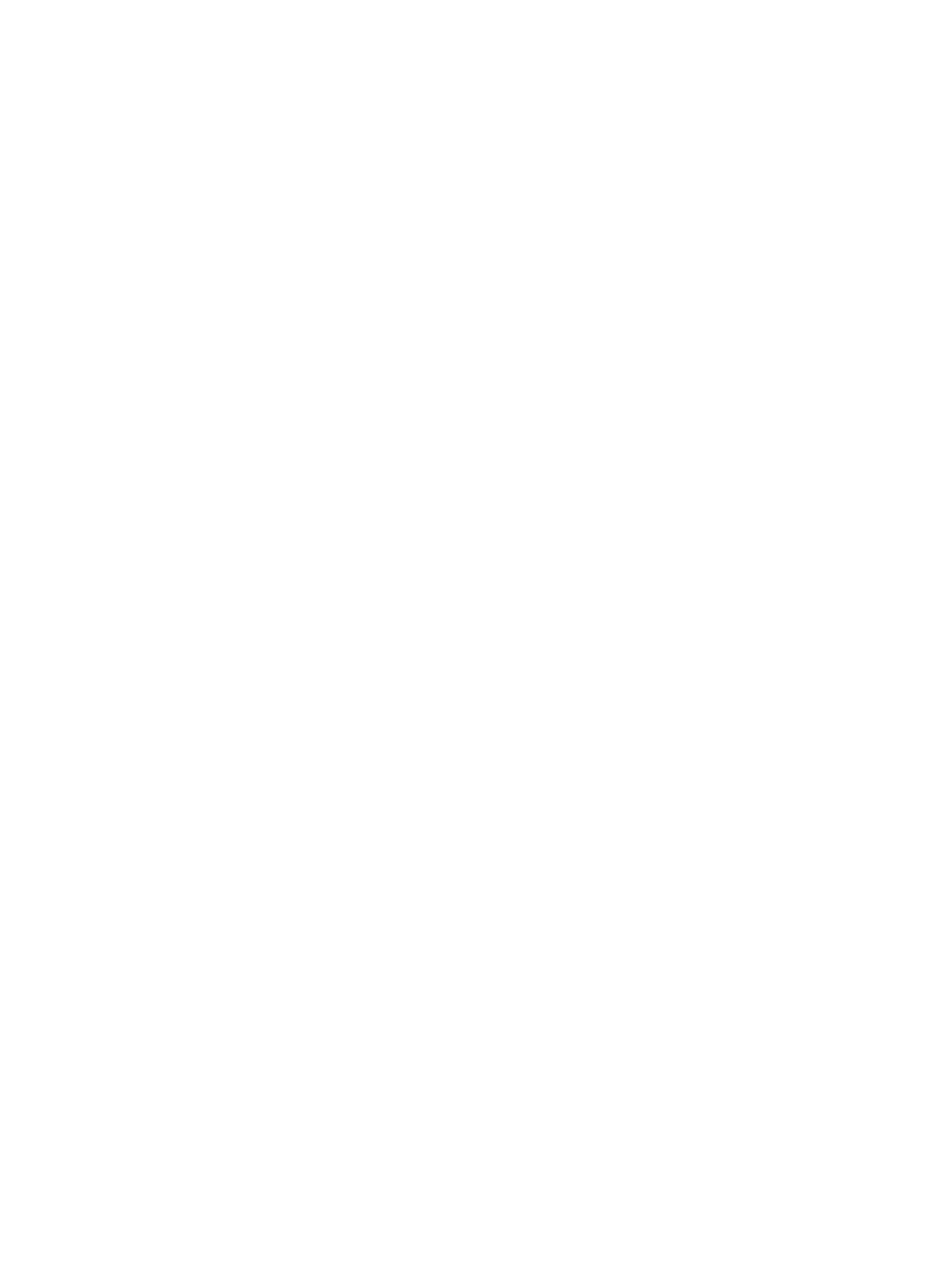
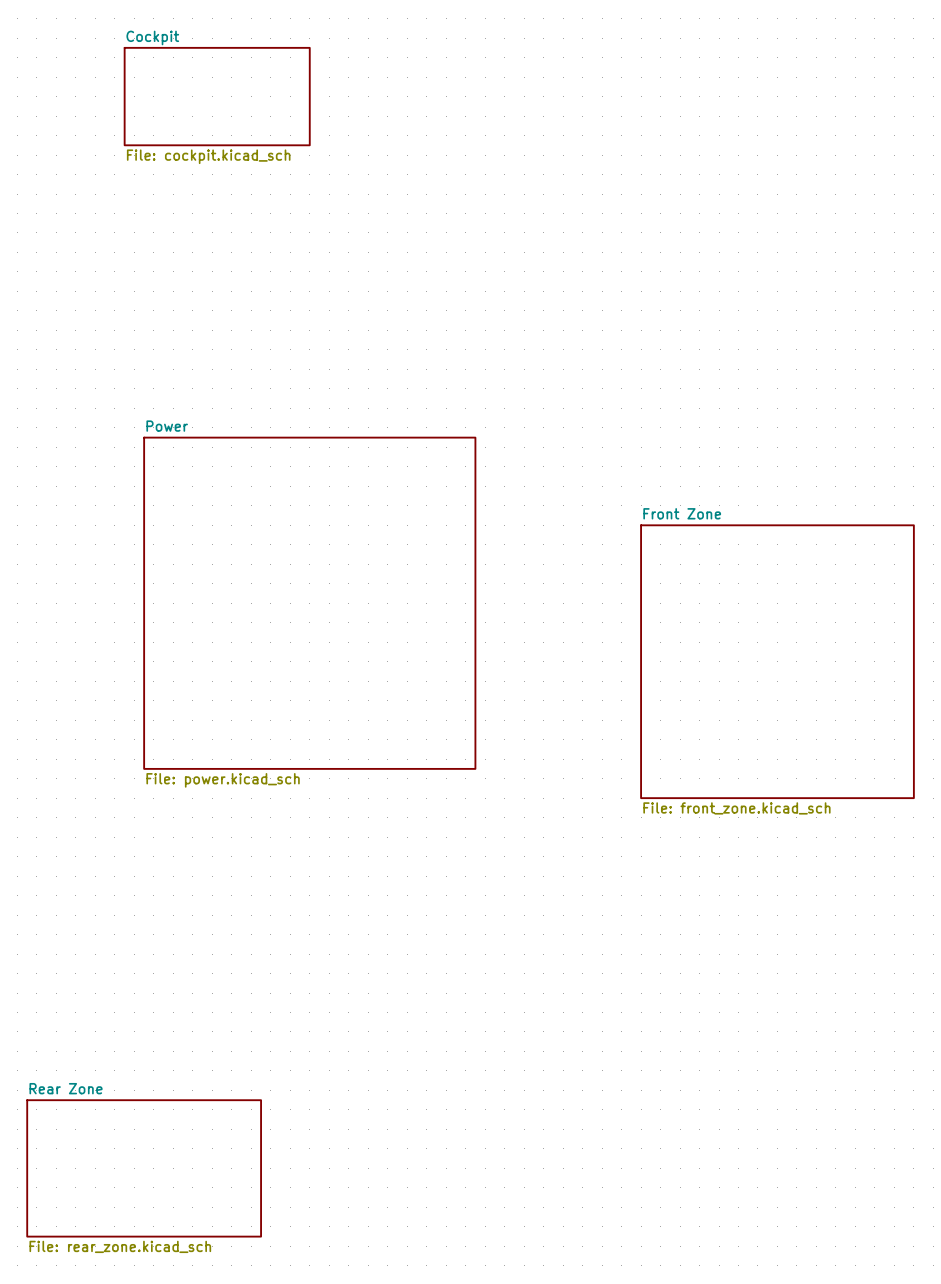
sheet Cockpit: none -> File: cockpit.kicad_sch (217, 96)
sheet Power: none -> File: power.kicad_sch (309, 603)
sheet Front Zone: none -> File: front_zone.kicad_sch (777, 661)
sheet Rear Zone: none -> File: rear_zone.kicad_sch (144, 1168)

